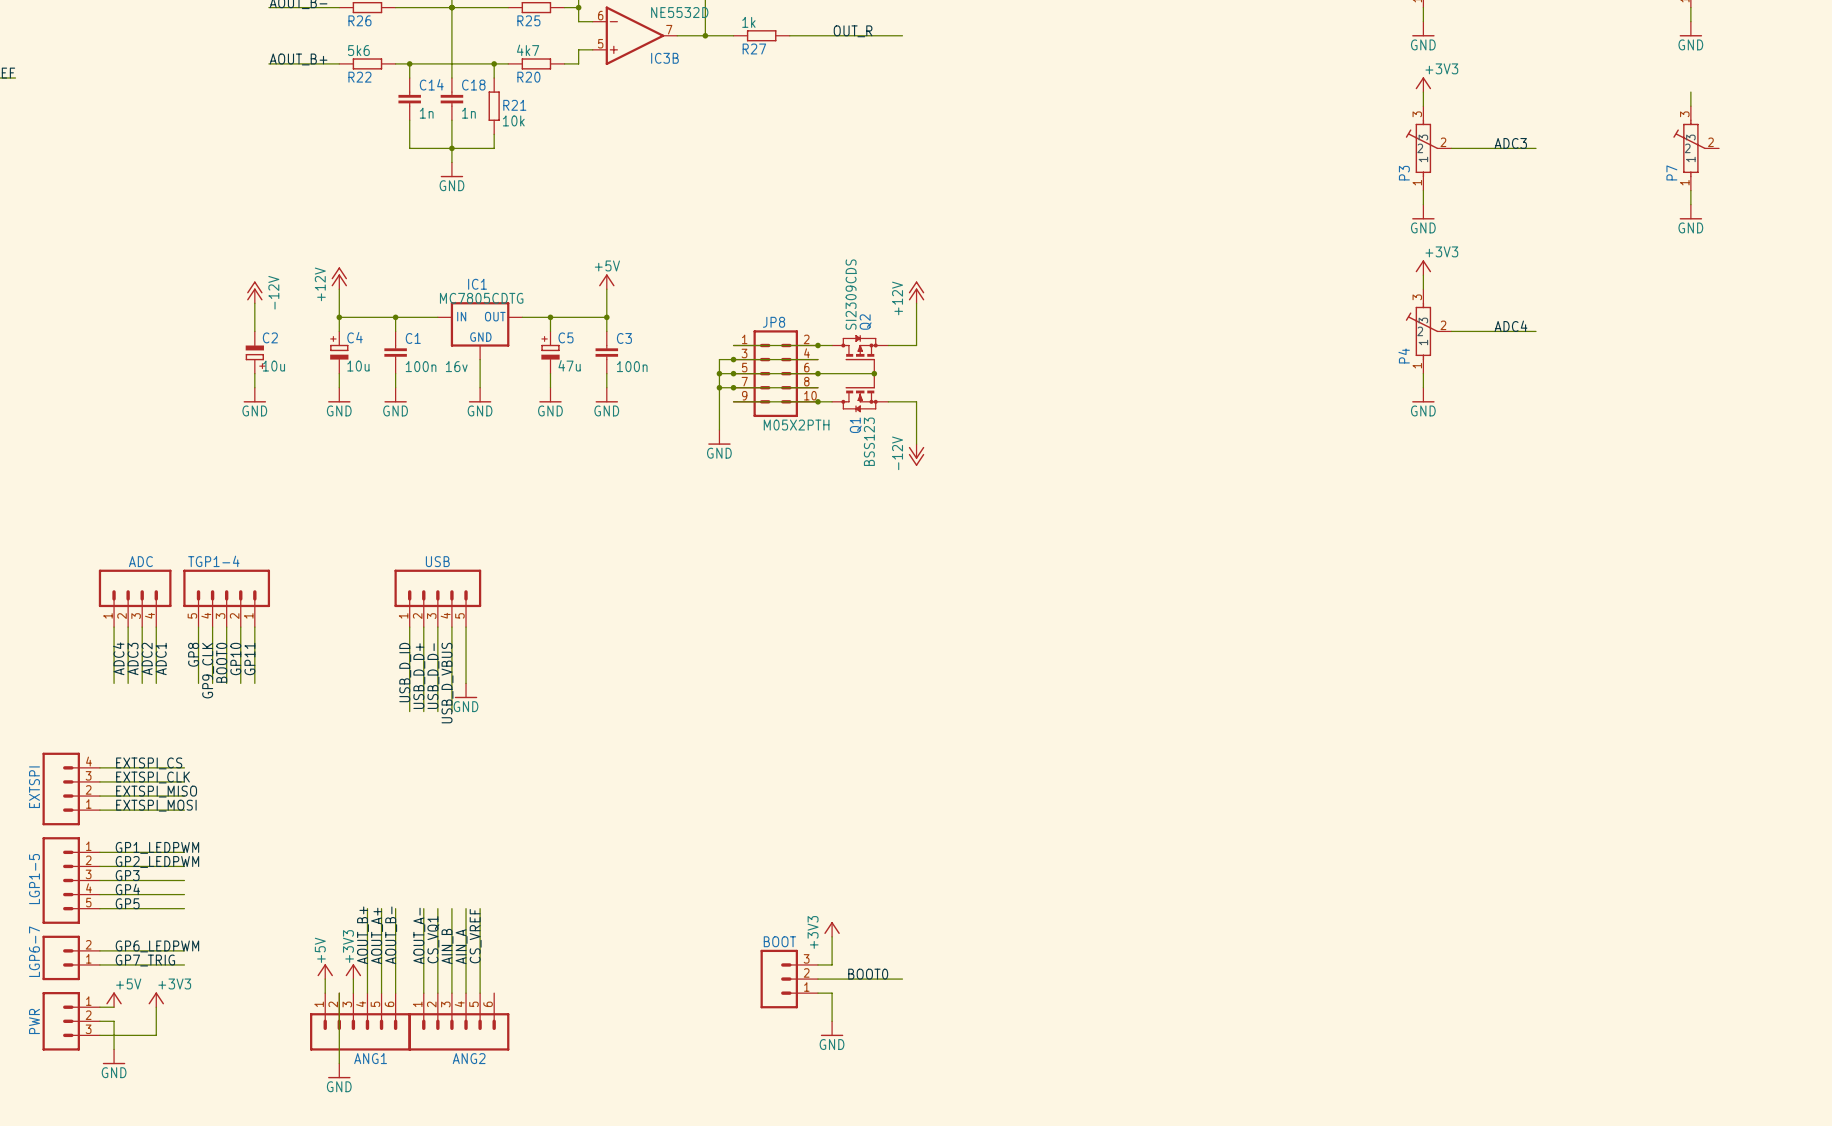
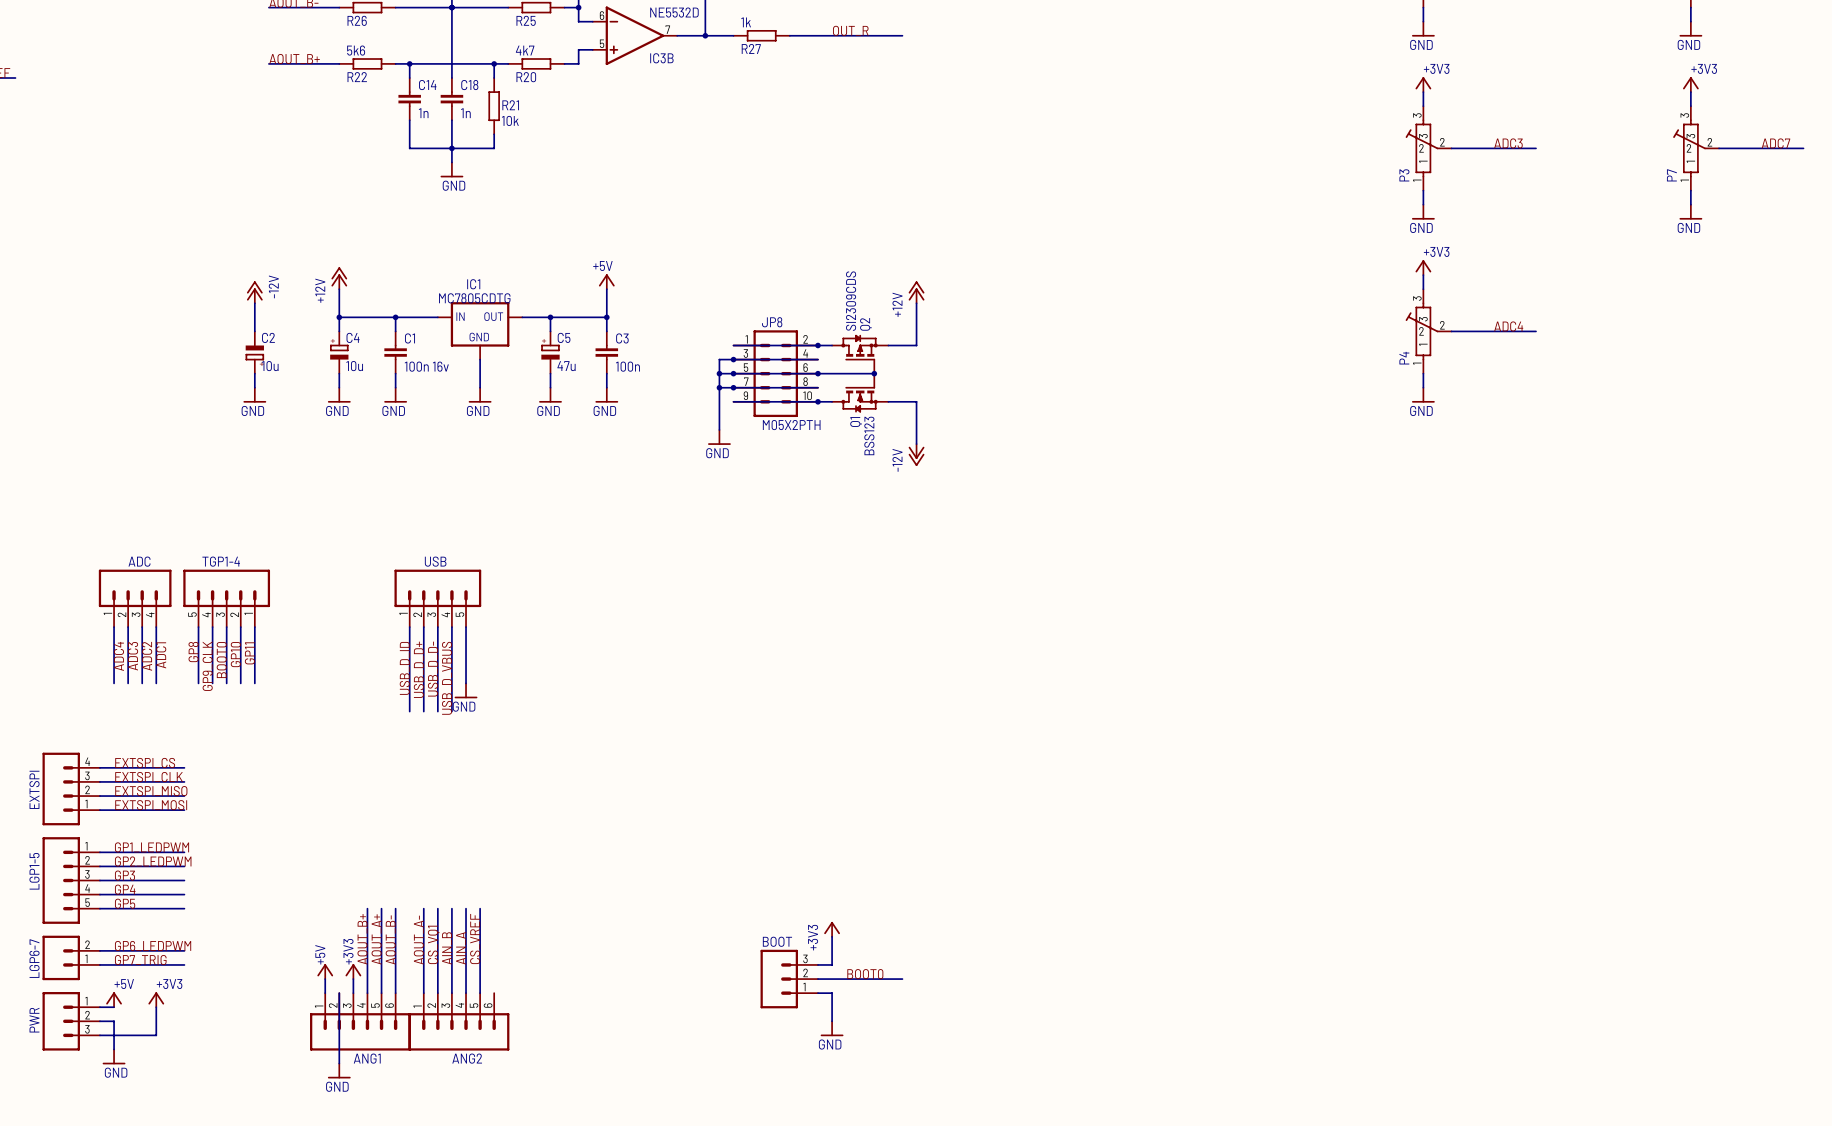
power symbol: none -> +3V3 (1690, 84)
label: none -> ADC7 (1775, 143)
wire: none -> (1719, 148) (1803, 148)

